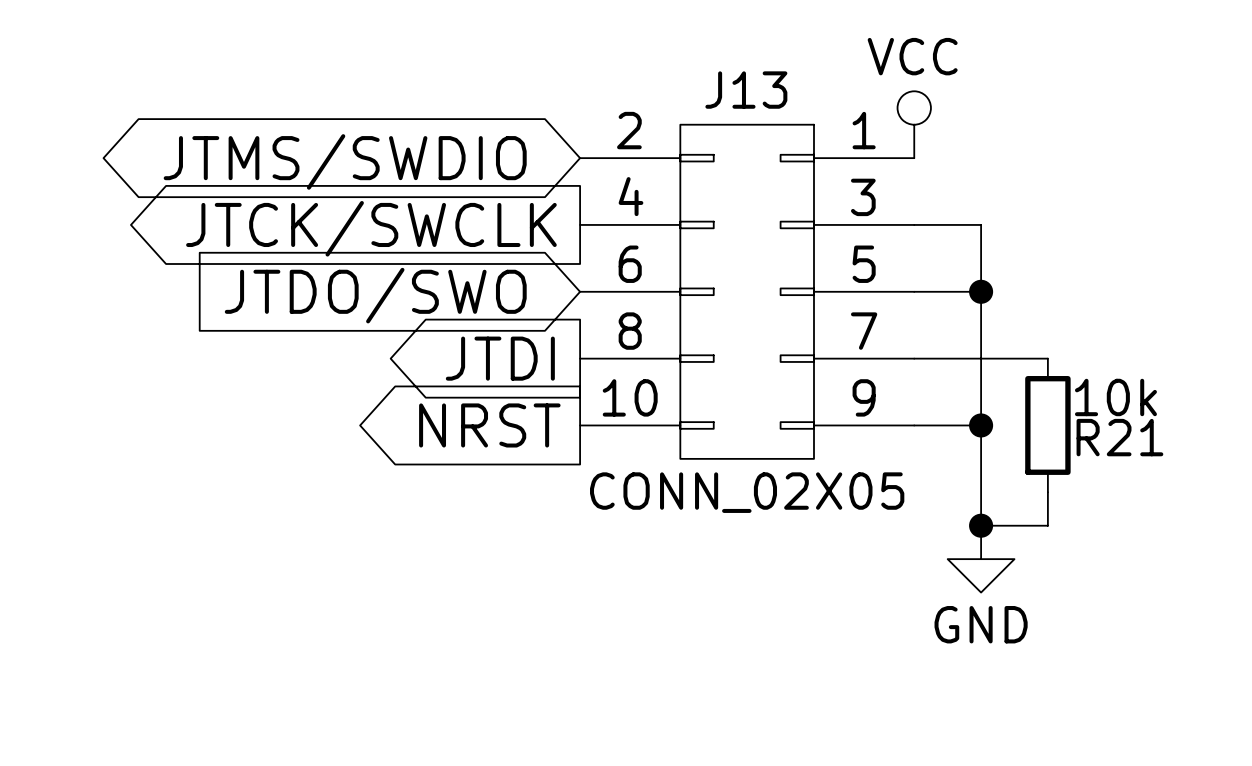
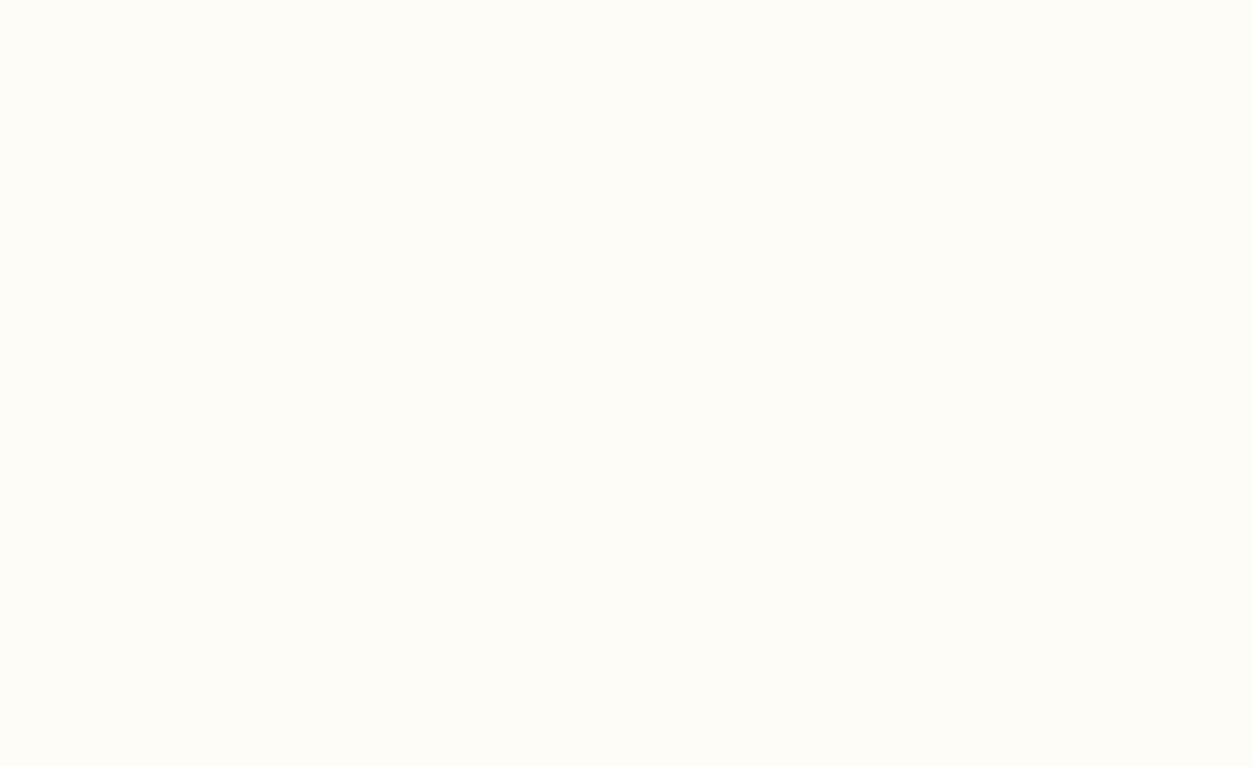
power symbol: VCC (914, 124) -> none
global label: JTMS/SWDIO (345, 161) -> none
wire: (914, 224) (981, 224) (981, 525) (1047, 525) (1047, 492) -> none
global label: JTCK/SWCLK (371, 228) -> none
J13: CONN_02X05 (747, 291) -> none
wire: (914, 291) (981, 291) -> none
junction: (981, 291) -> none
global label: JTDO/SWO (375, 295) -> none
global label: JTDI (500, 358) -> none
wire: (914, 358) (1047, 358) -> none
global label: NRST (489, 425) -> none
wire: (914, 425) (981, 425) -> none
junction: (981, 425) -> none
R21: 10k (1047, 425) -> none
junction: (981, 525) -> none
power symbol: GND (981, 559) -> none

